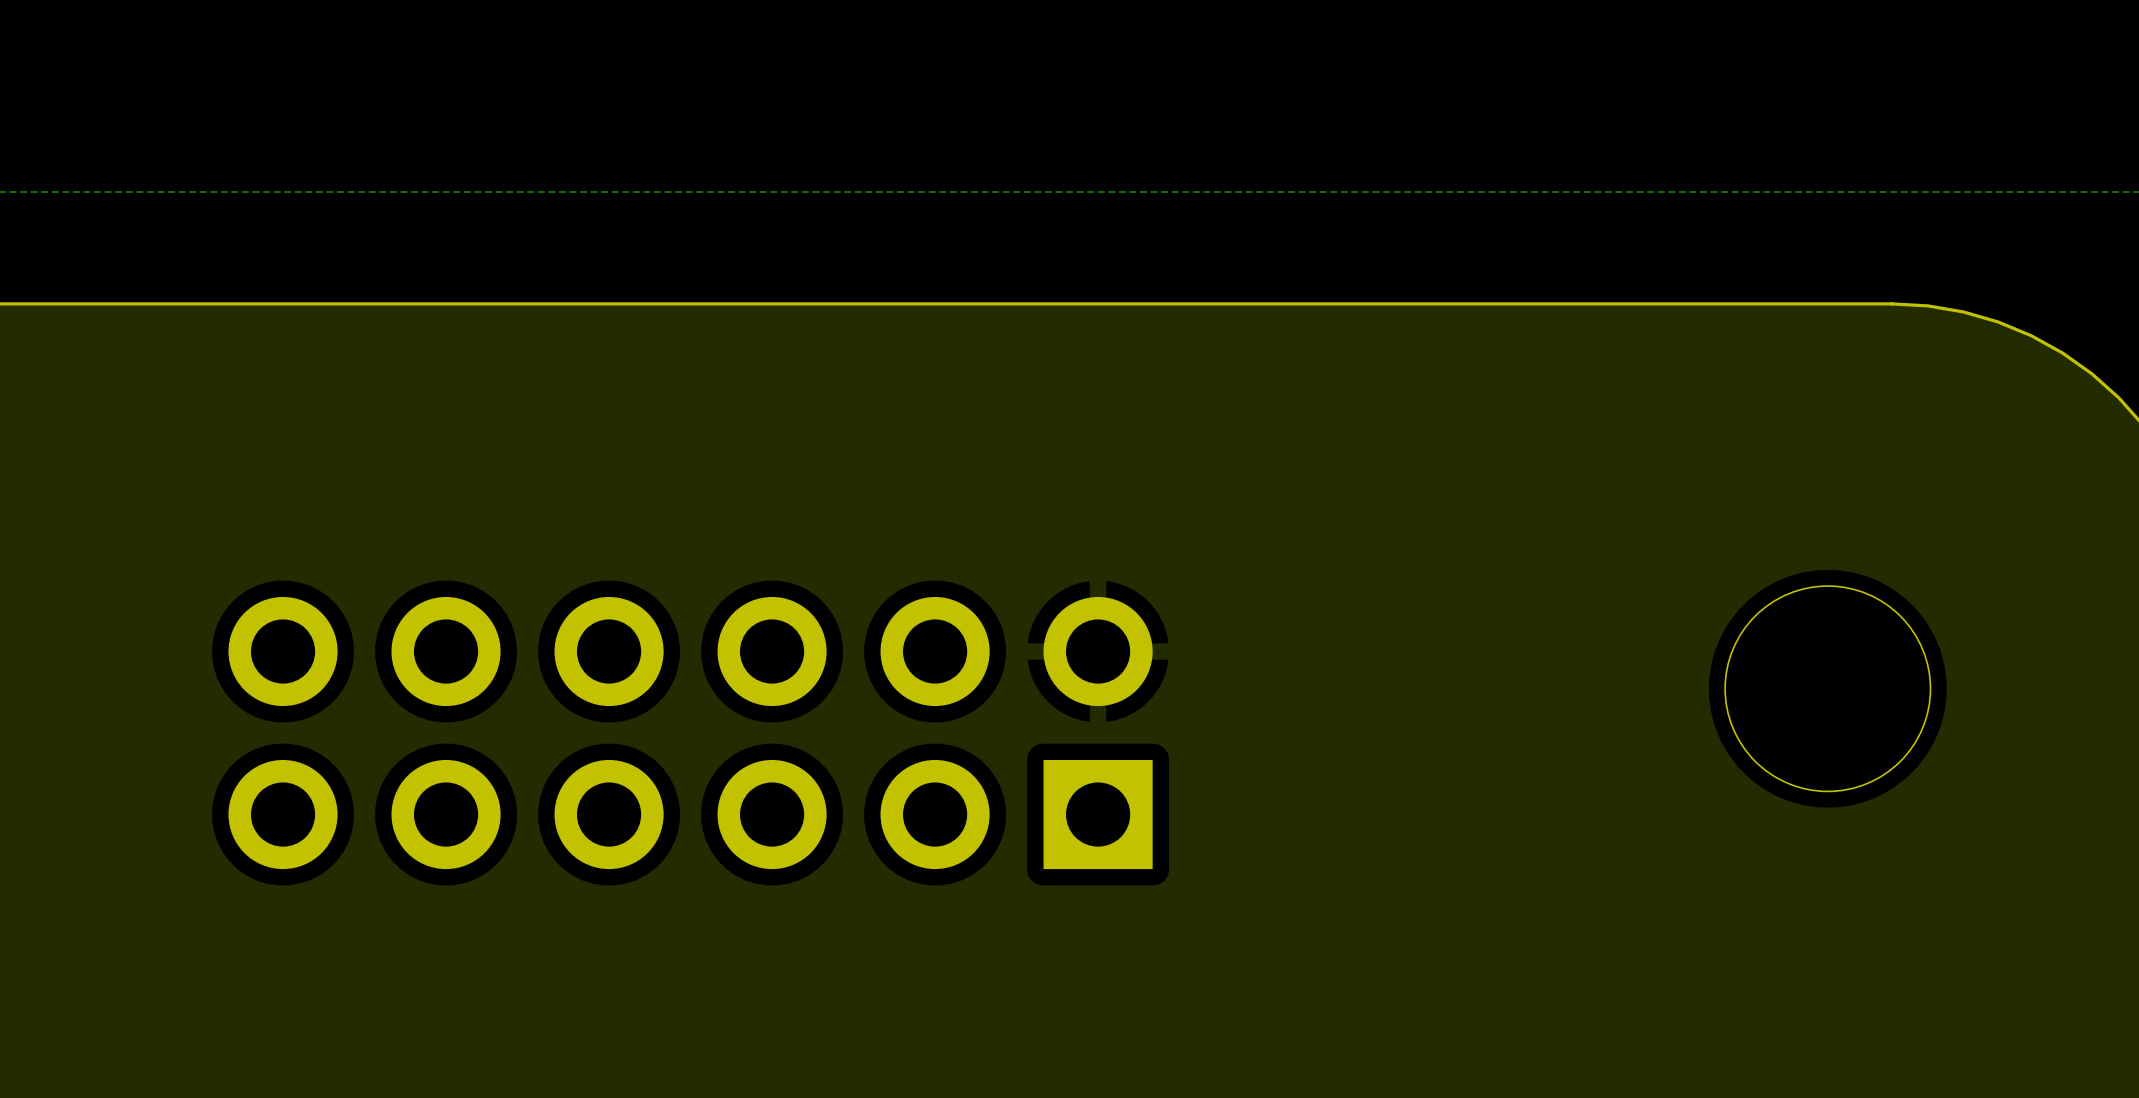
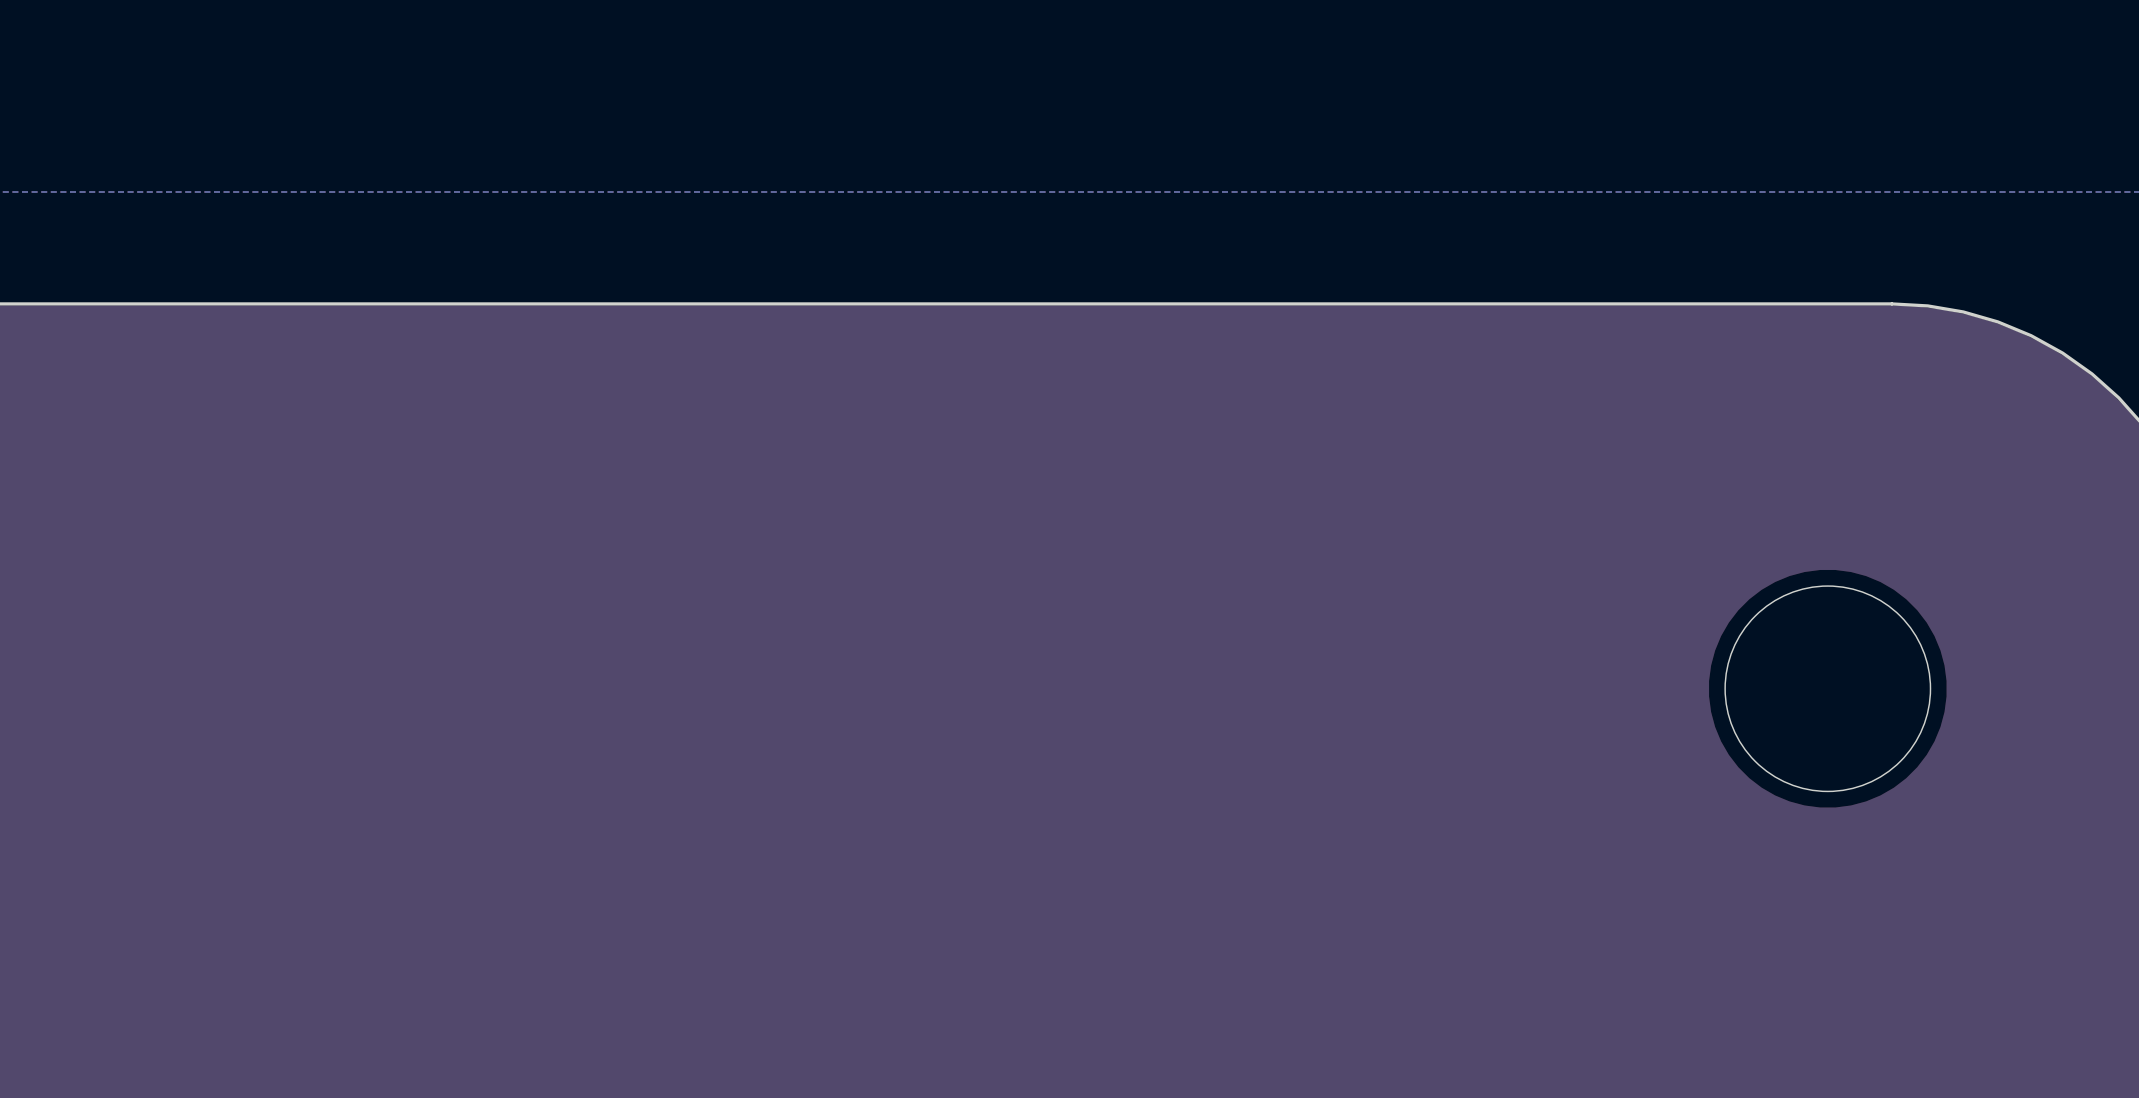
part: (690, 733) -> none

